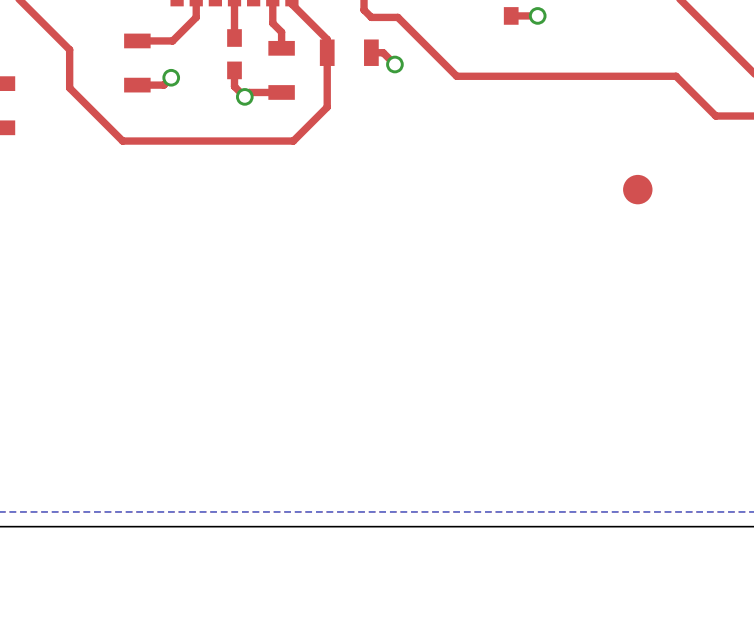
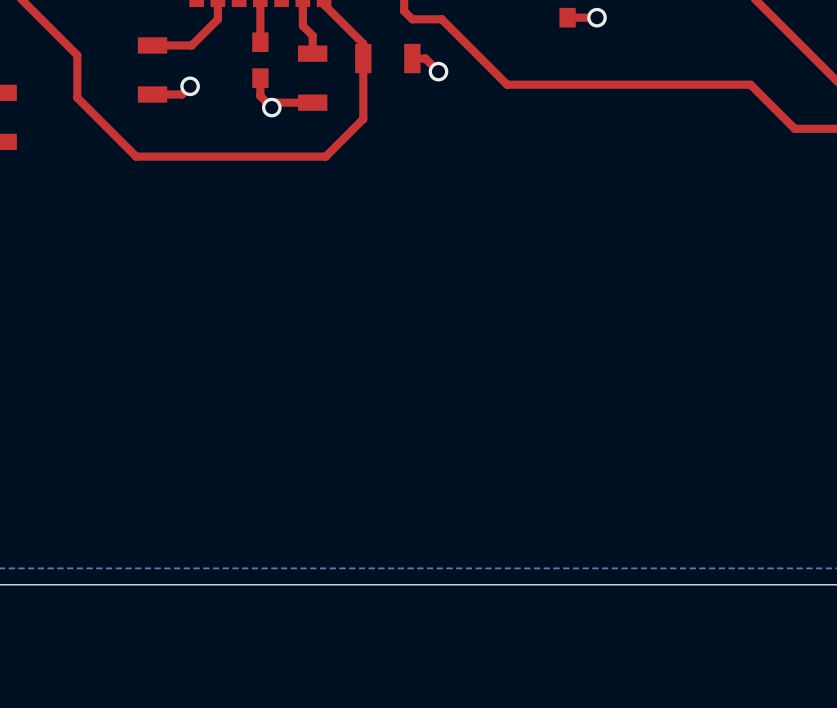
part: (637, 189) -> none

